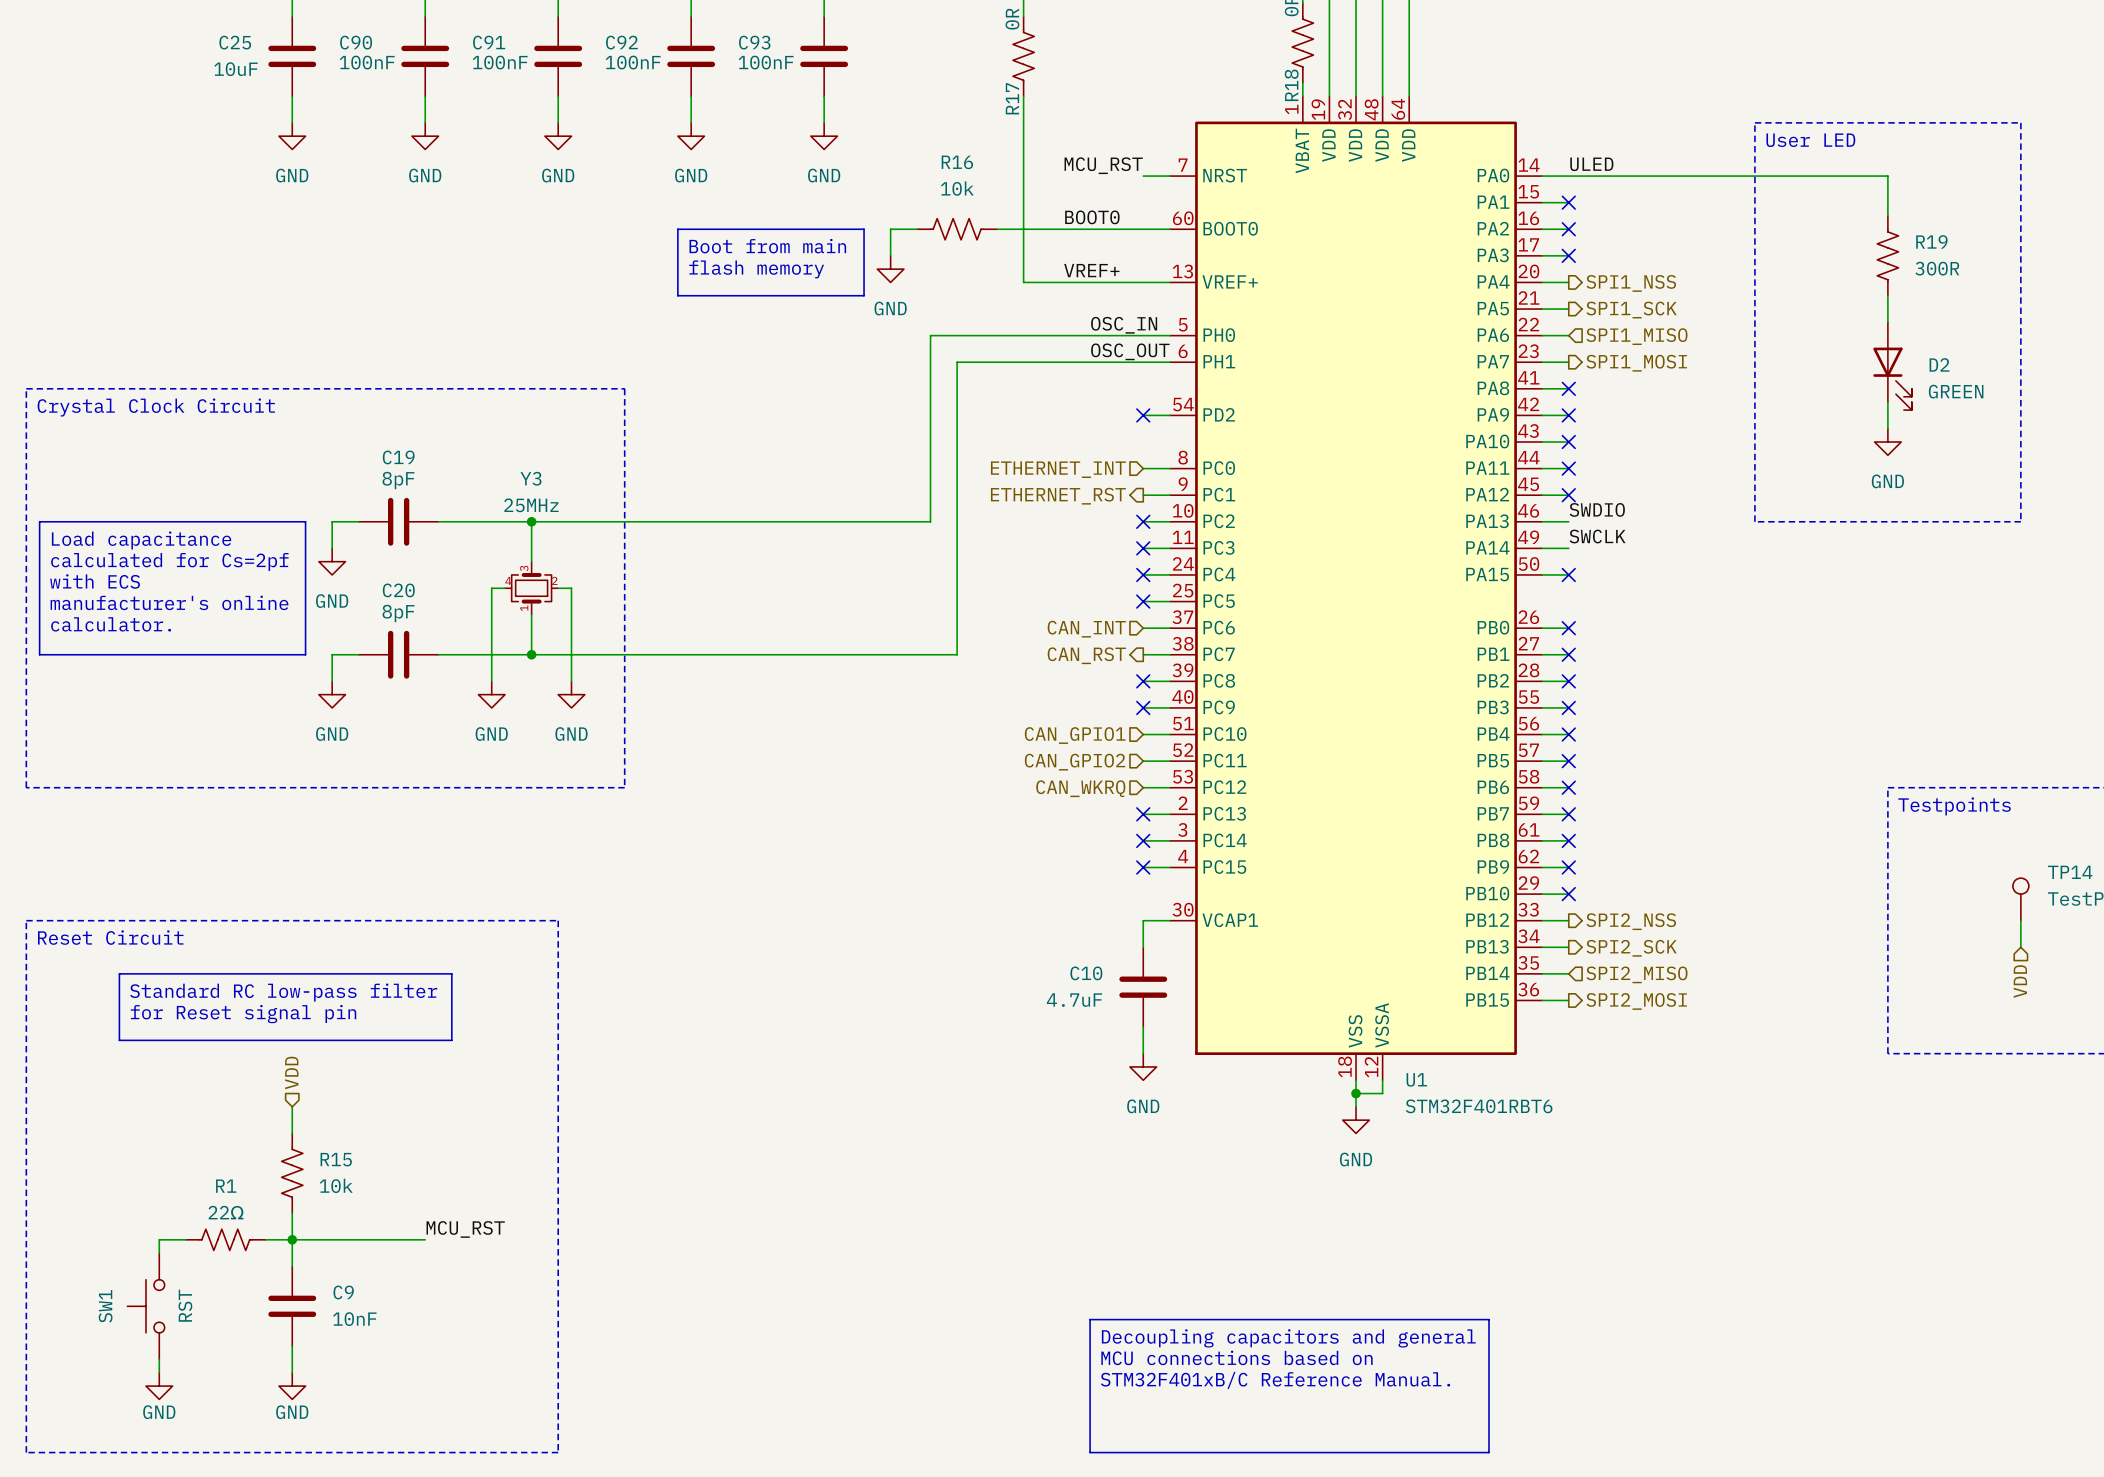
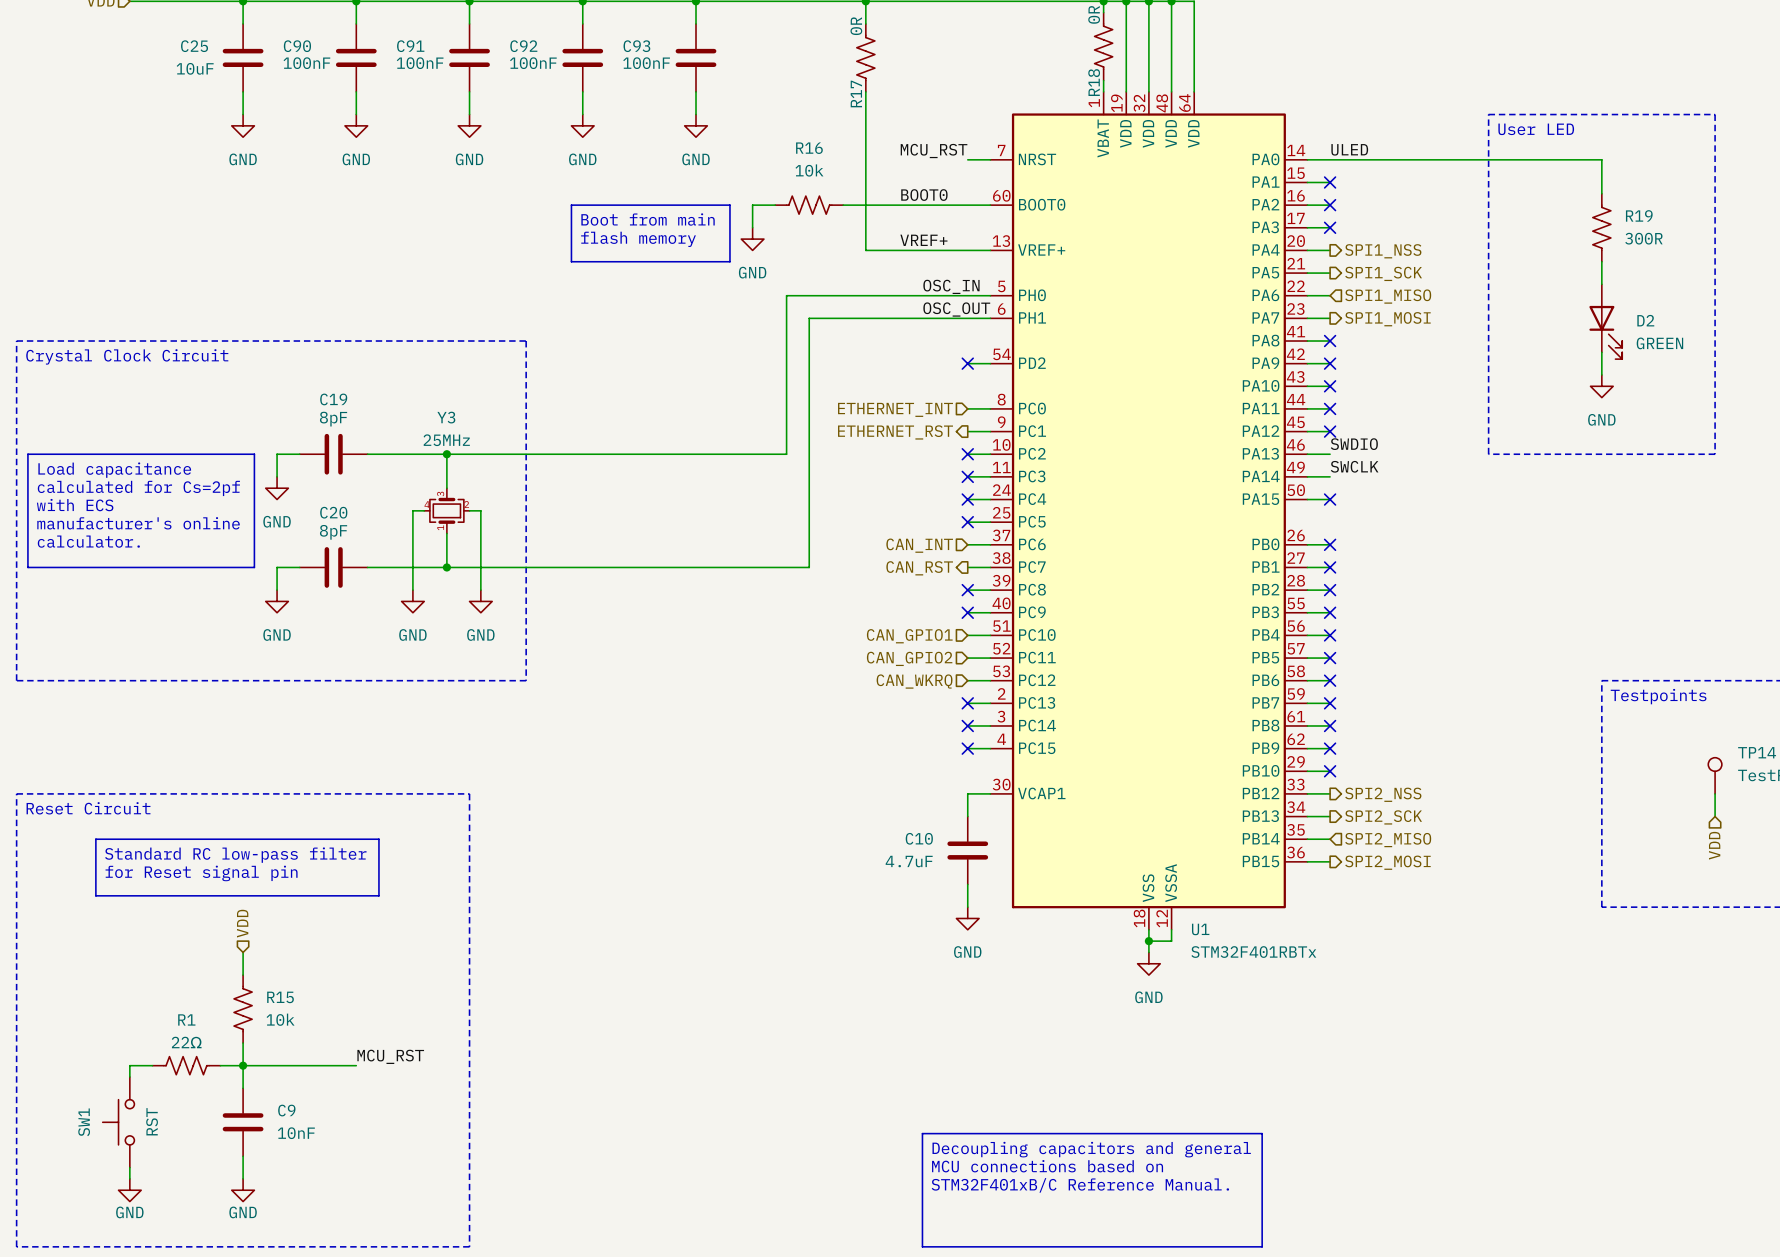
U1 value: STM32F401RBT6 (1479, 1106) -> STM32F401RBTx (1253, 952)

